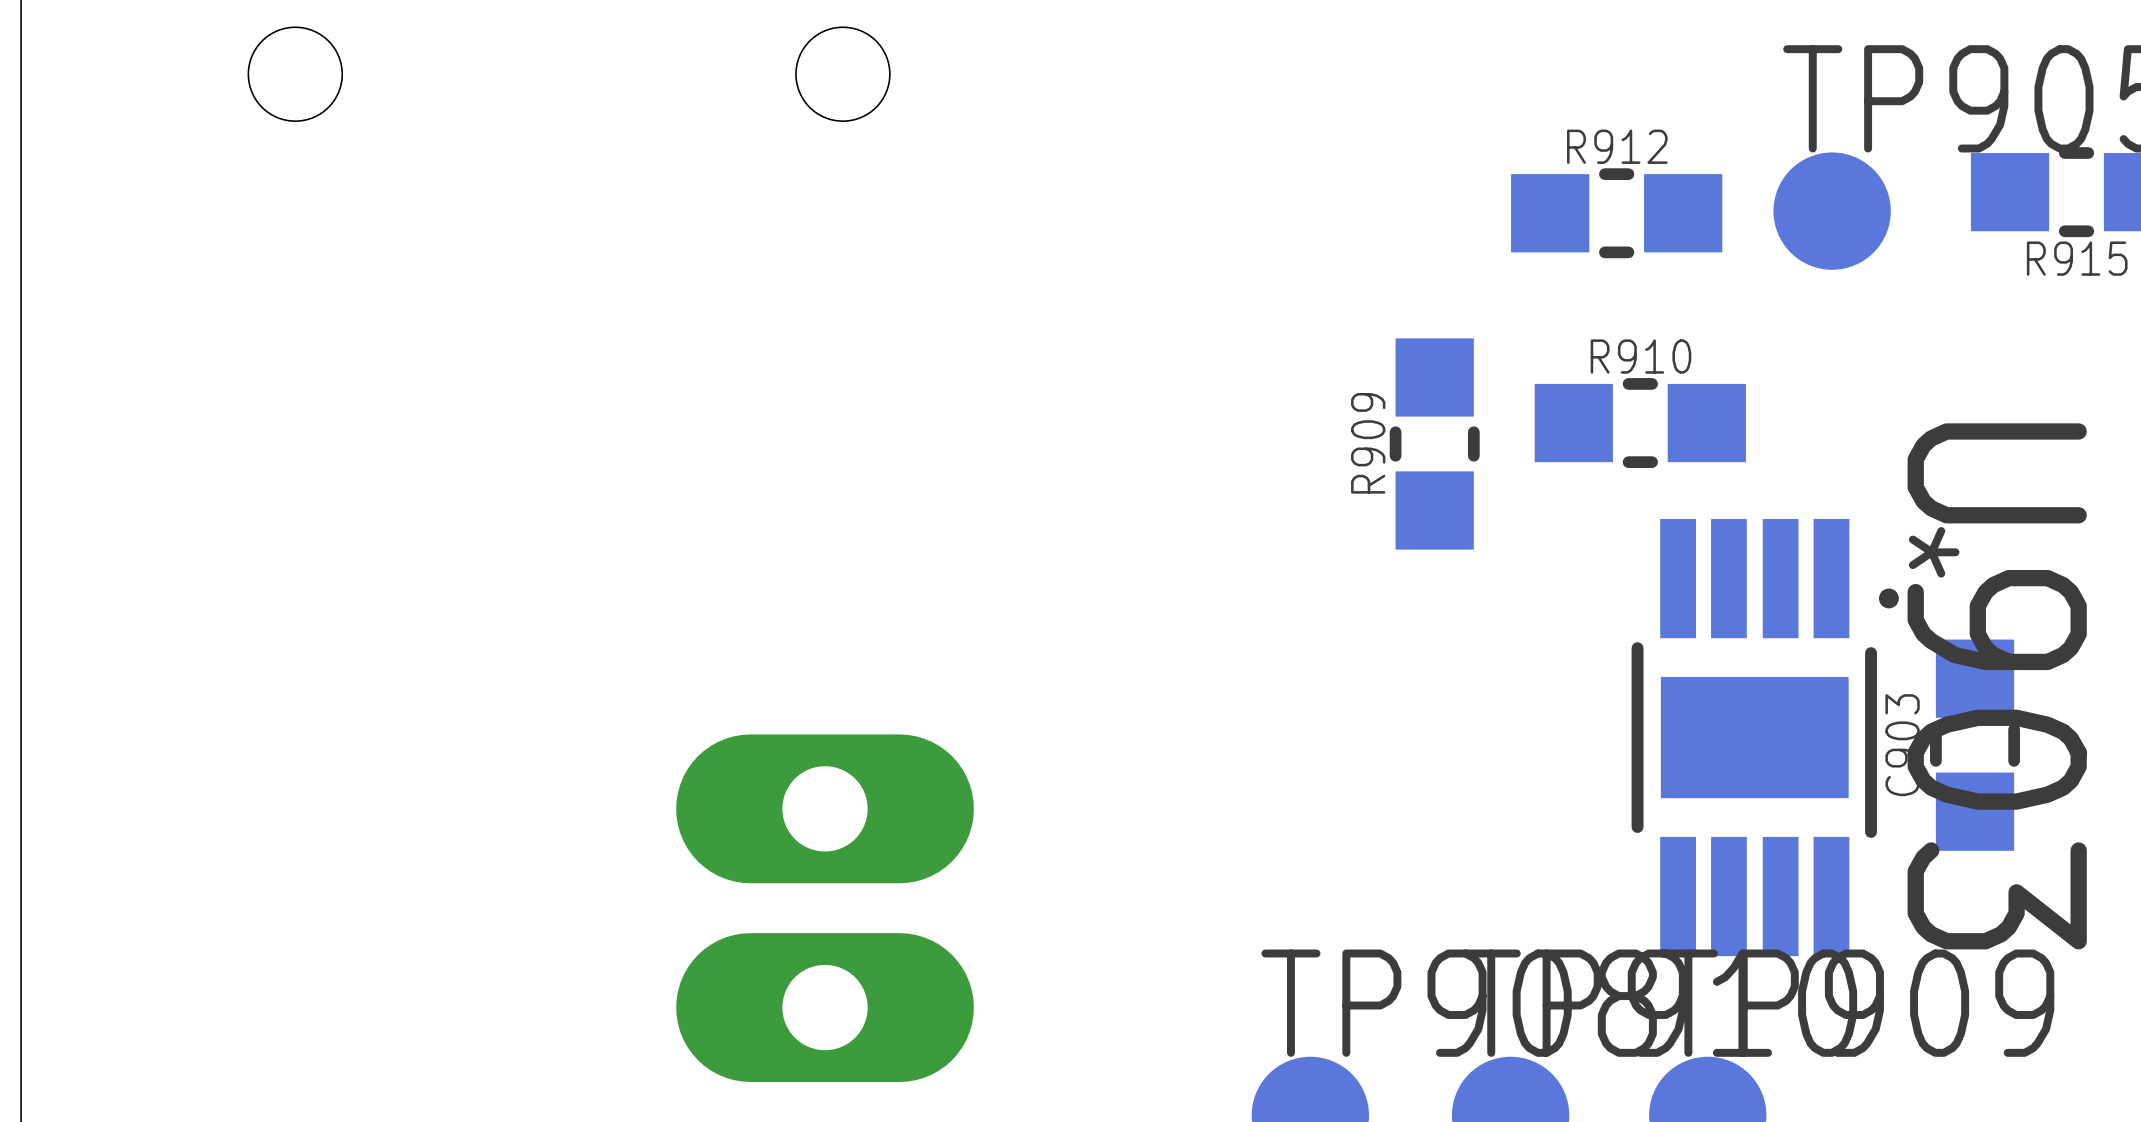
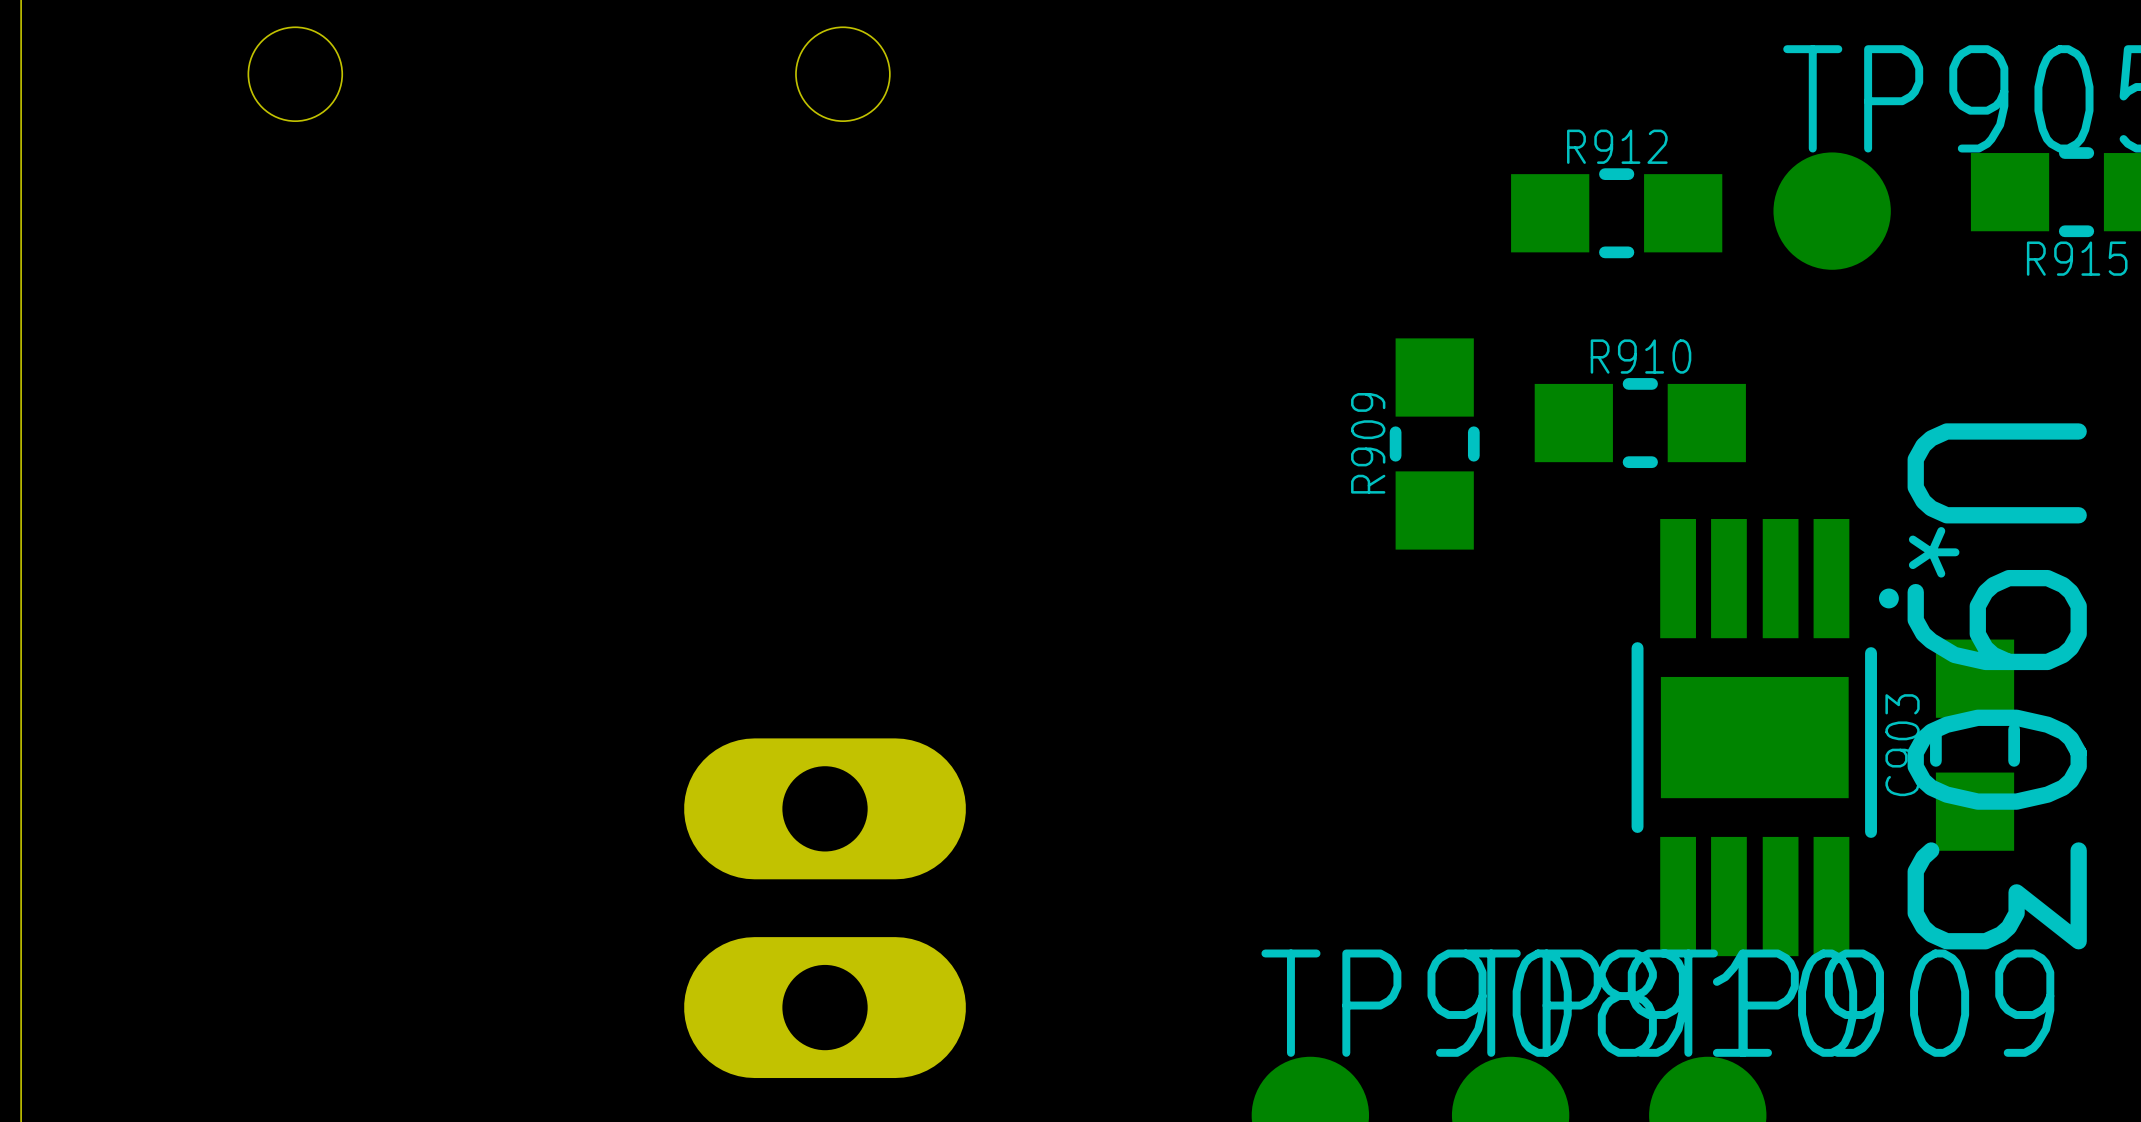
part footprint: [676, 734, 974, 1082] -> [684, 738, 966, 1079]

